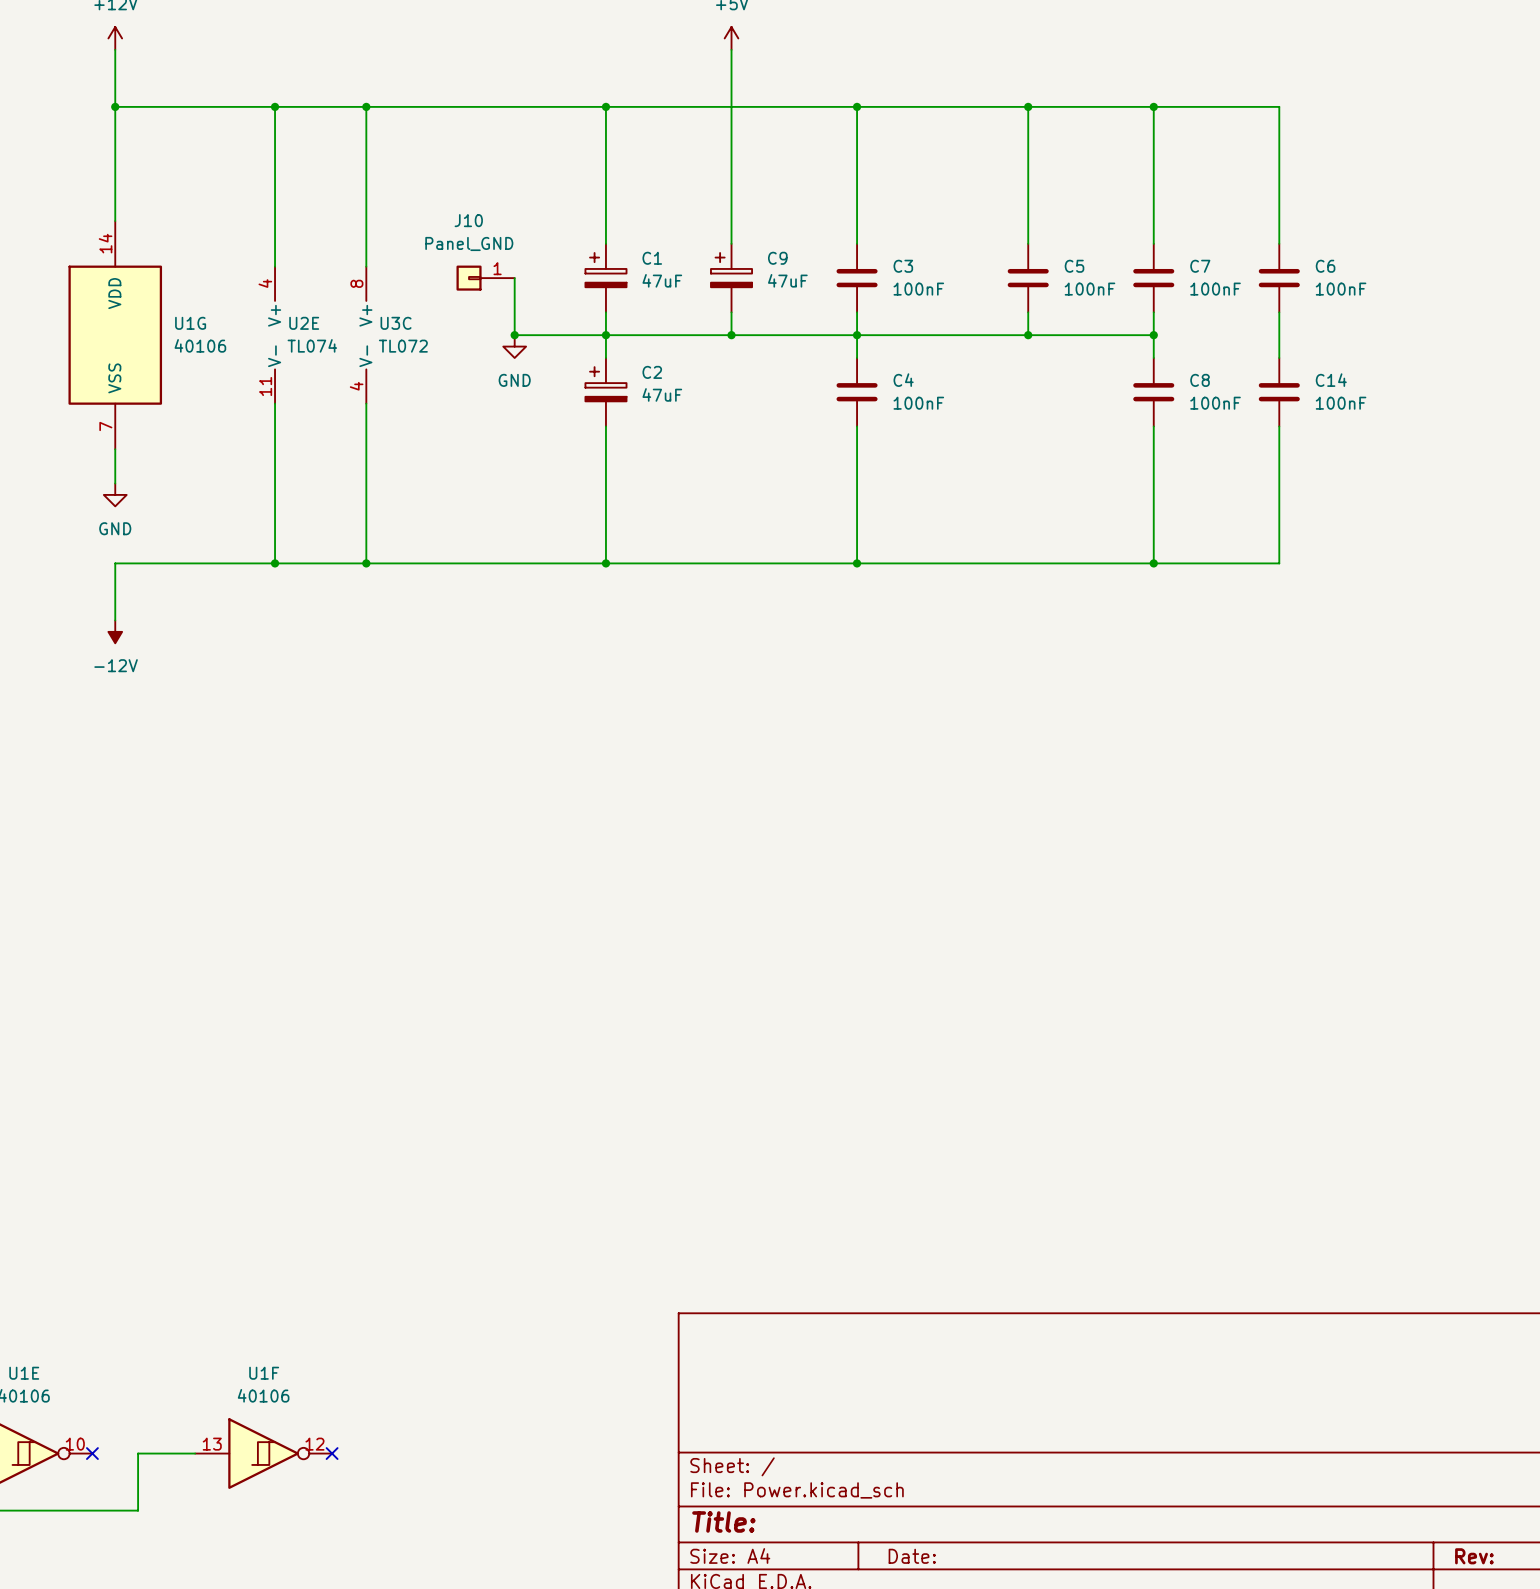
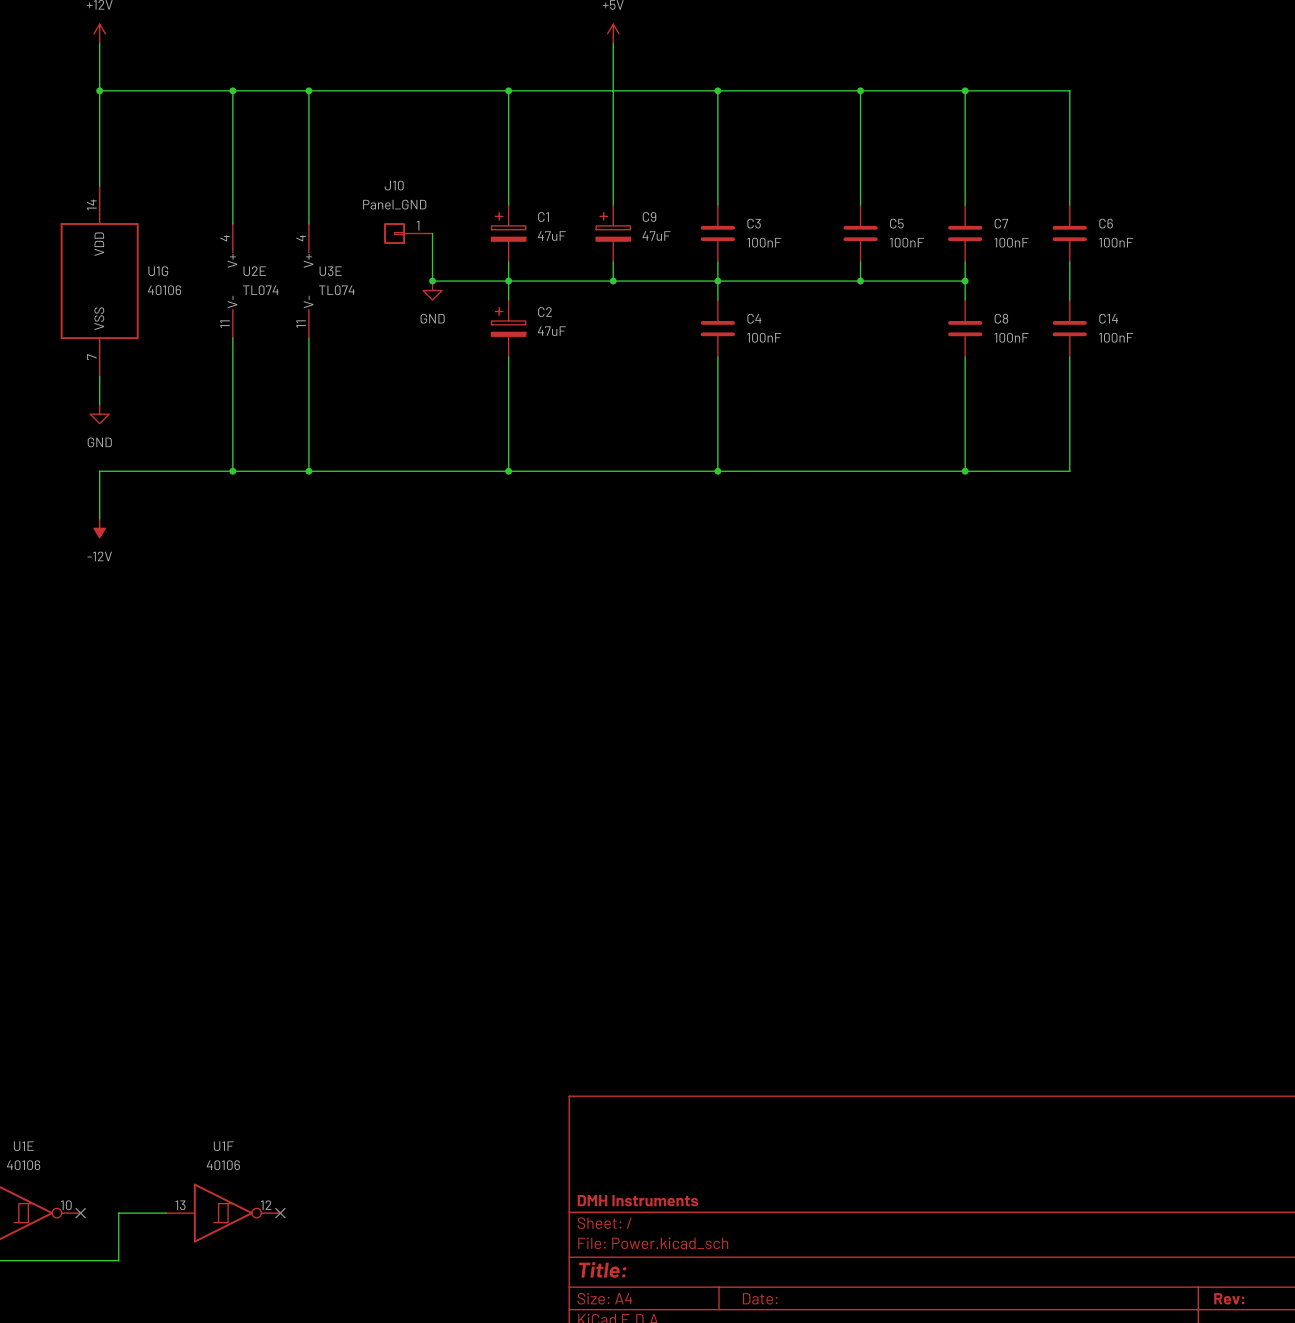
U3C pin number: 8 (356, 283) -> 4 (301, 238)
U3C name: U3C (396, 323) -> U3E (330, 271)
U3C value: TL072 (403, 346) -> TL074 (336, 290)
U3C pin number: 4 (356, 386) -> 11 (301, 324)
title block: none -> DMH Instruments (637, 1200)

